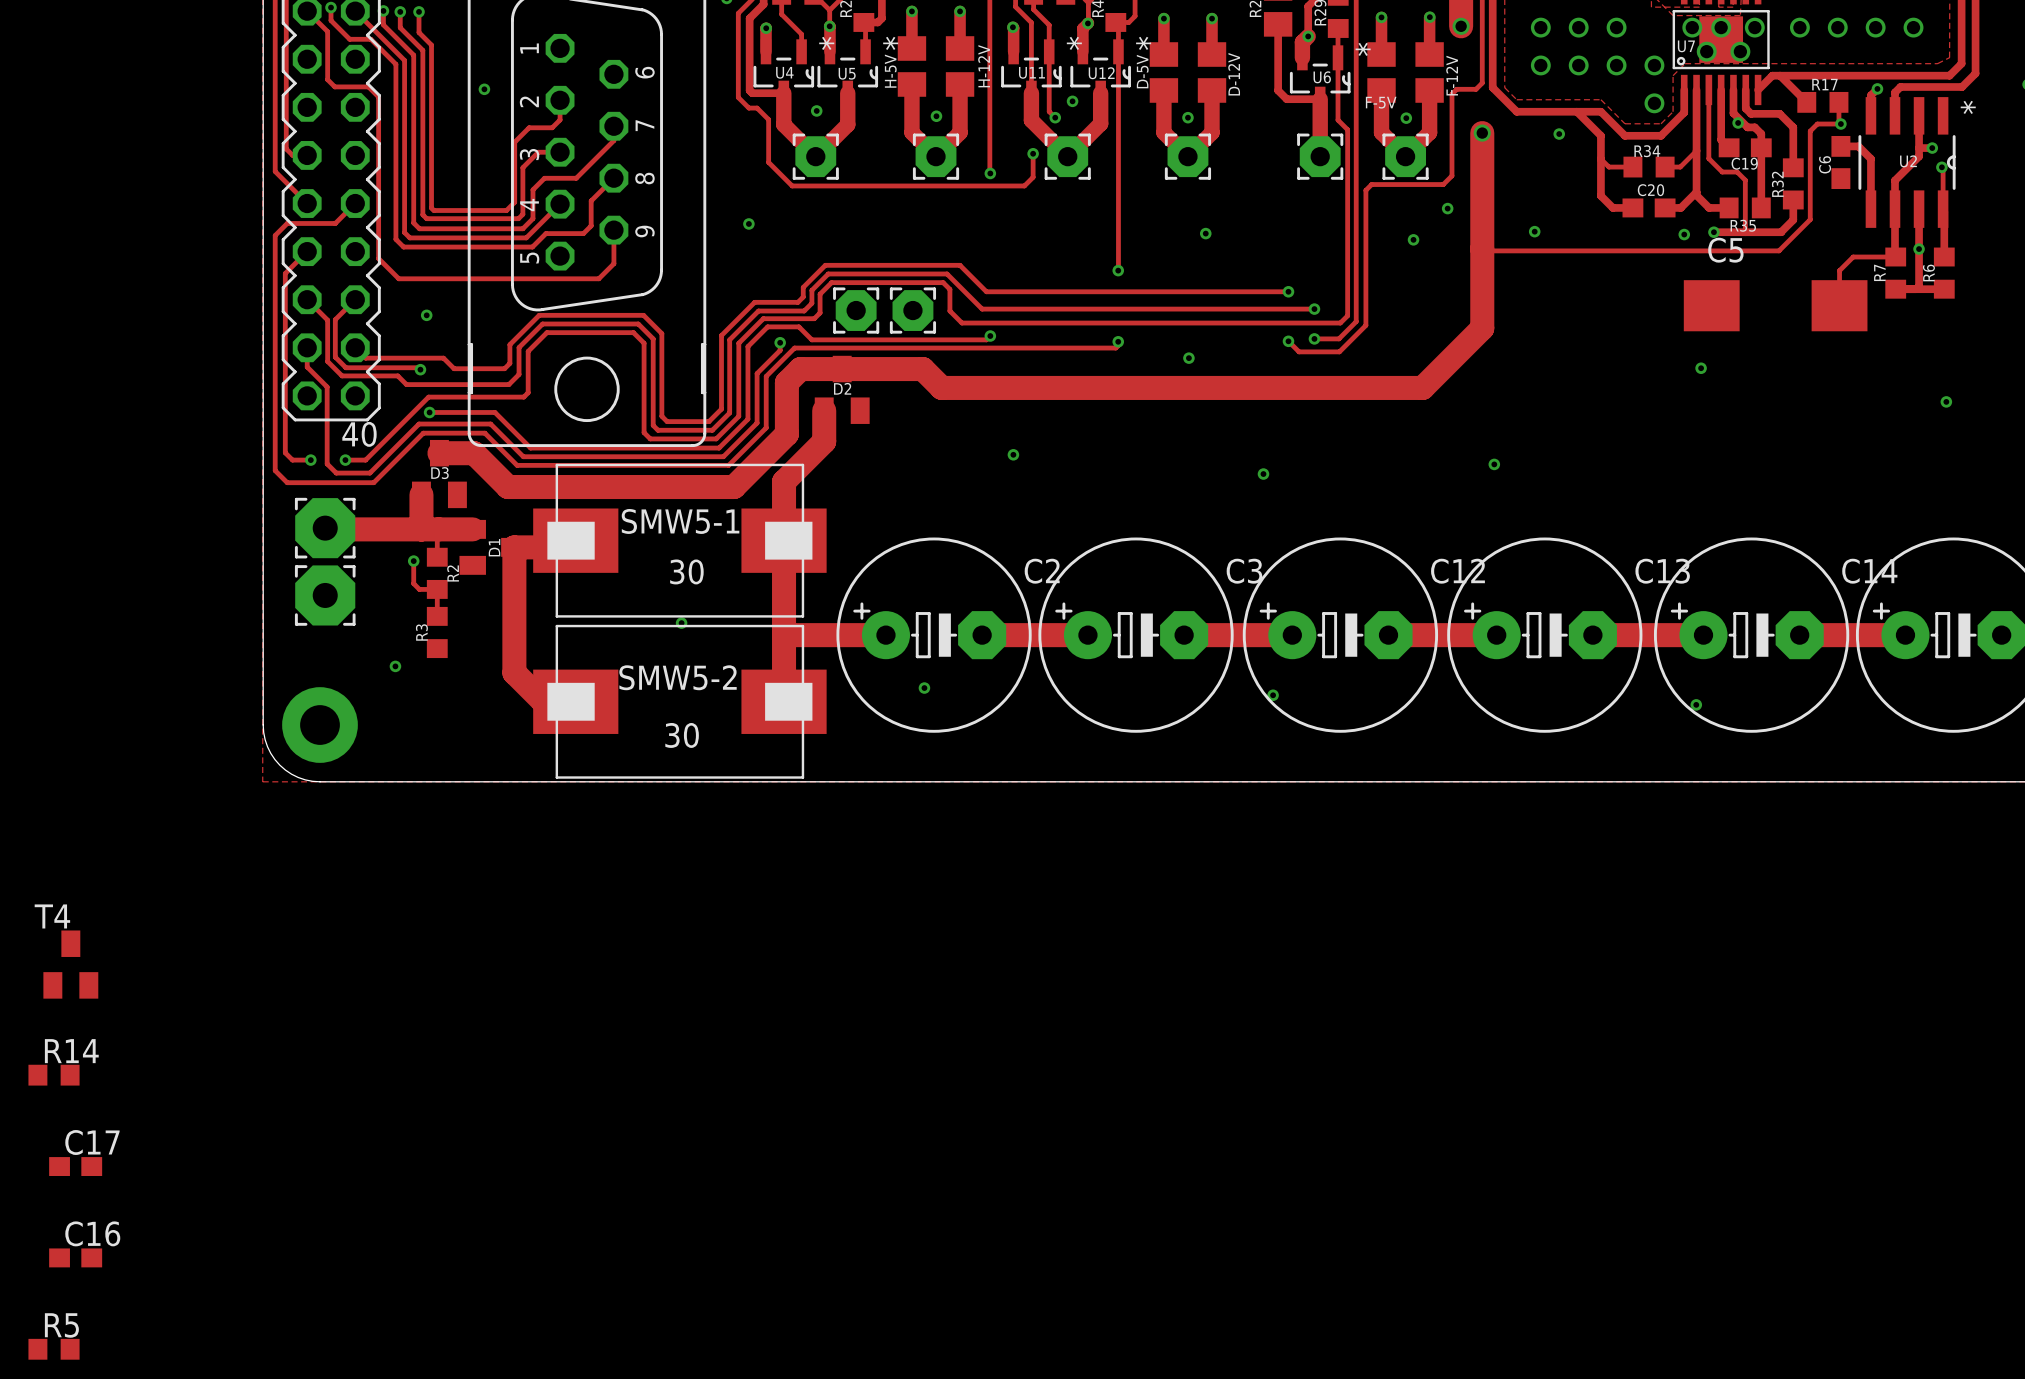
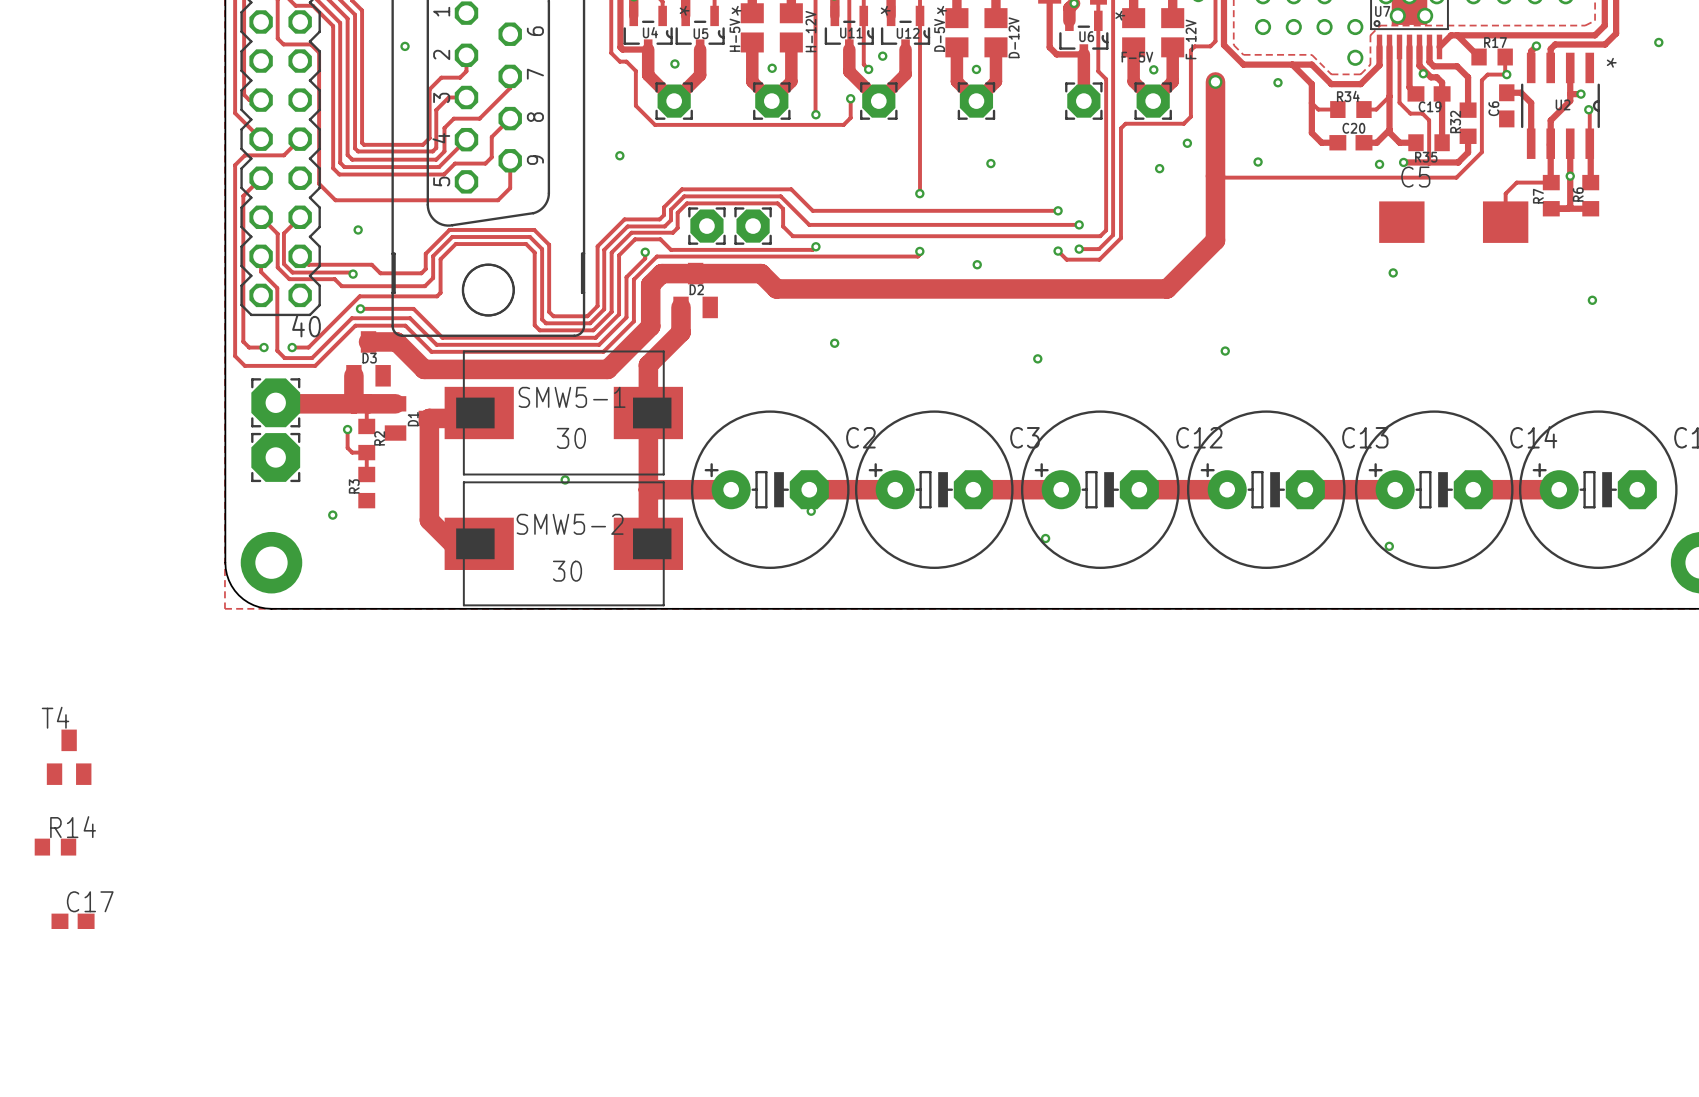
via position: (924, 688) -> (811, 511)
C16: (75, 1257) -> none
R5: (54, 1349) -> none

